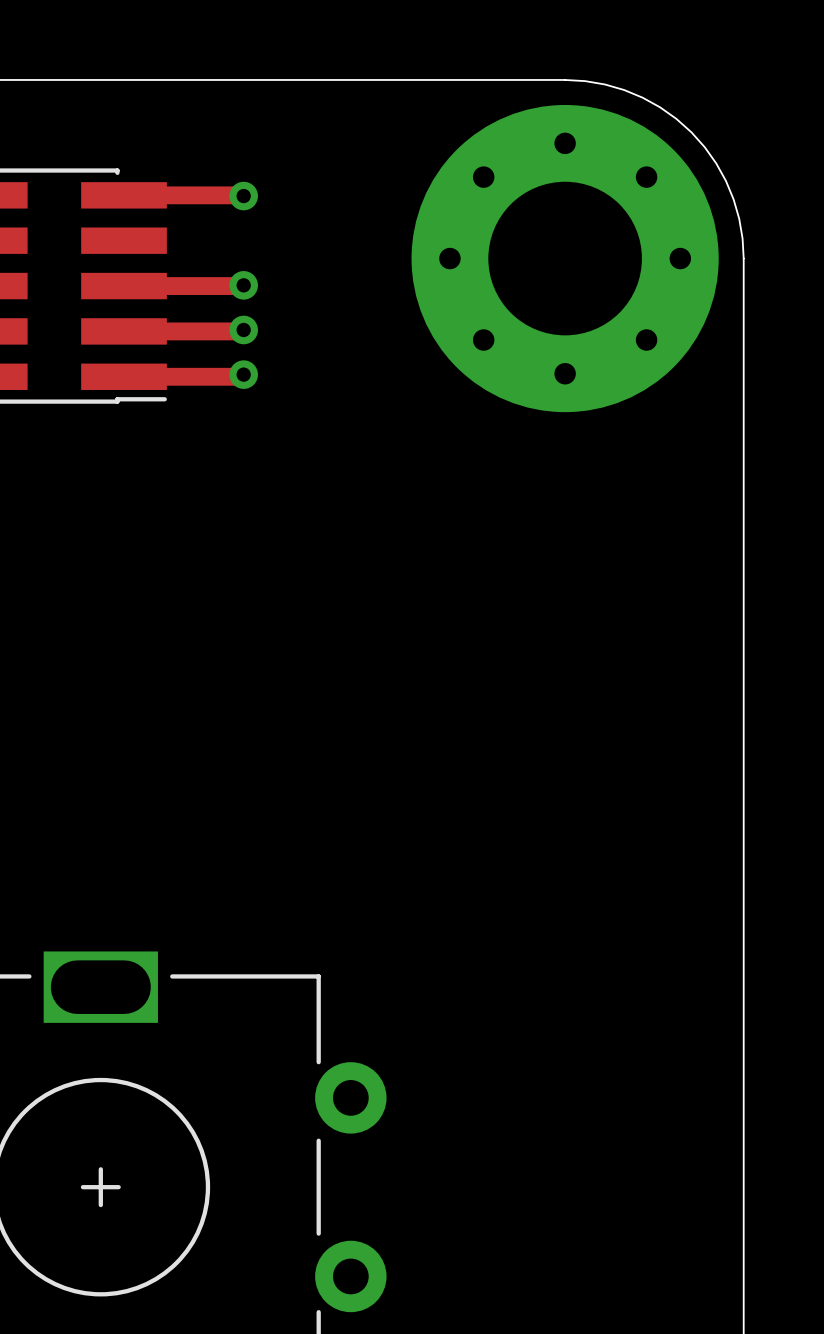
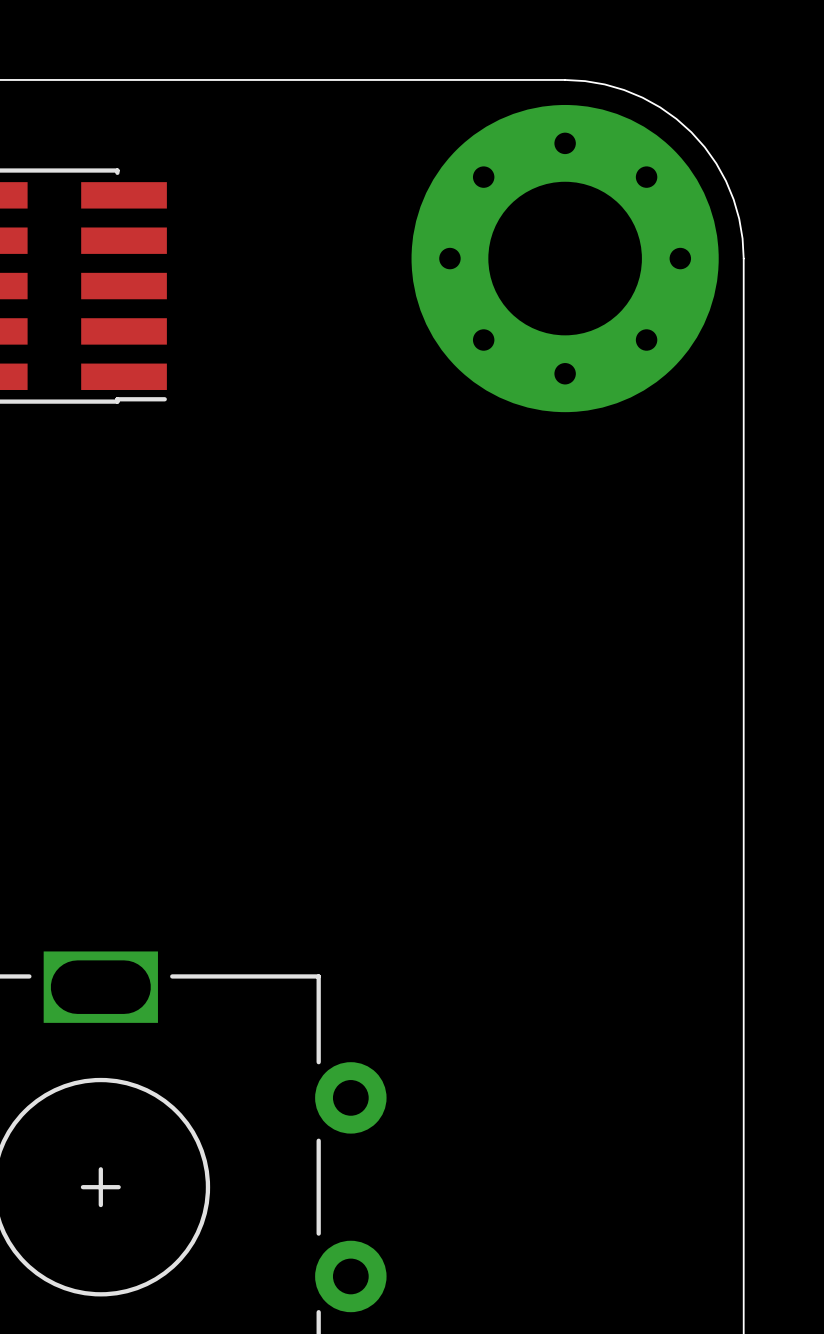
top track: (124, 195) (243, 196) -> none
via: (243, 196) -> none
top track: (243, 285) (124, 286) -> none
via: (243, 285) -> none
top track: (243, 329) (124, 331) -> none
via: (243, 329) -> none
top track: (243, 374) (241, 376) (124, 376) -> none
via: (243, 374) -> none

